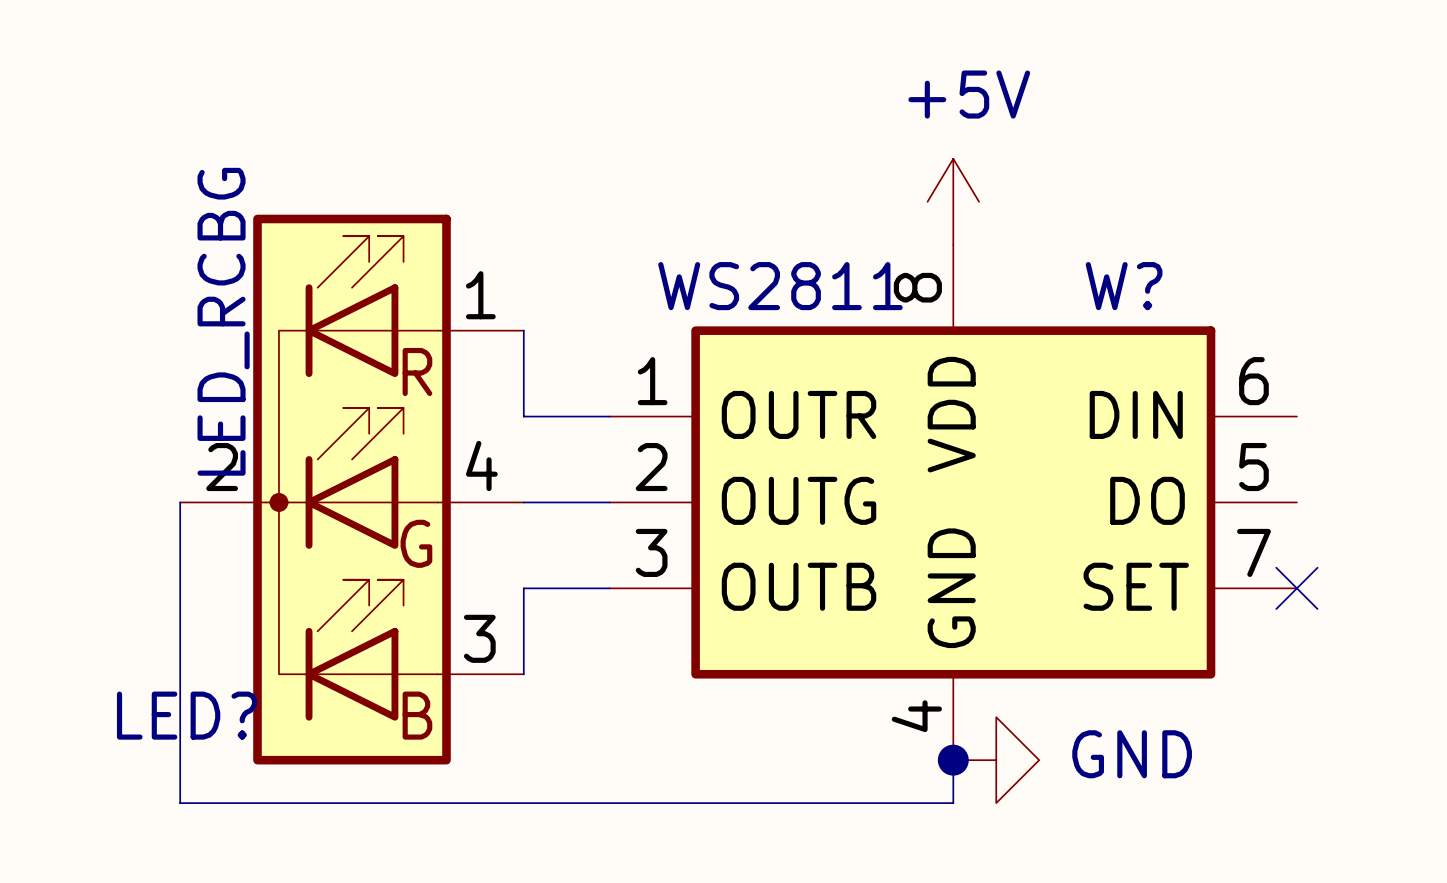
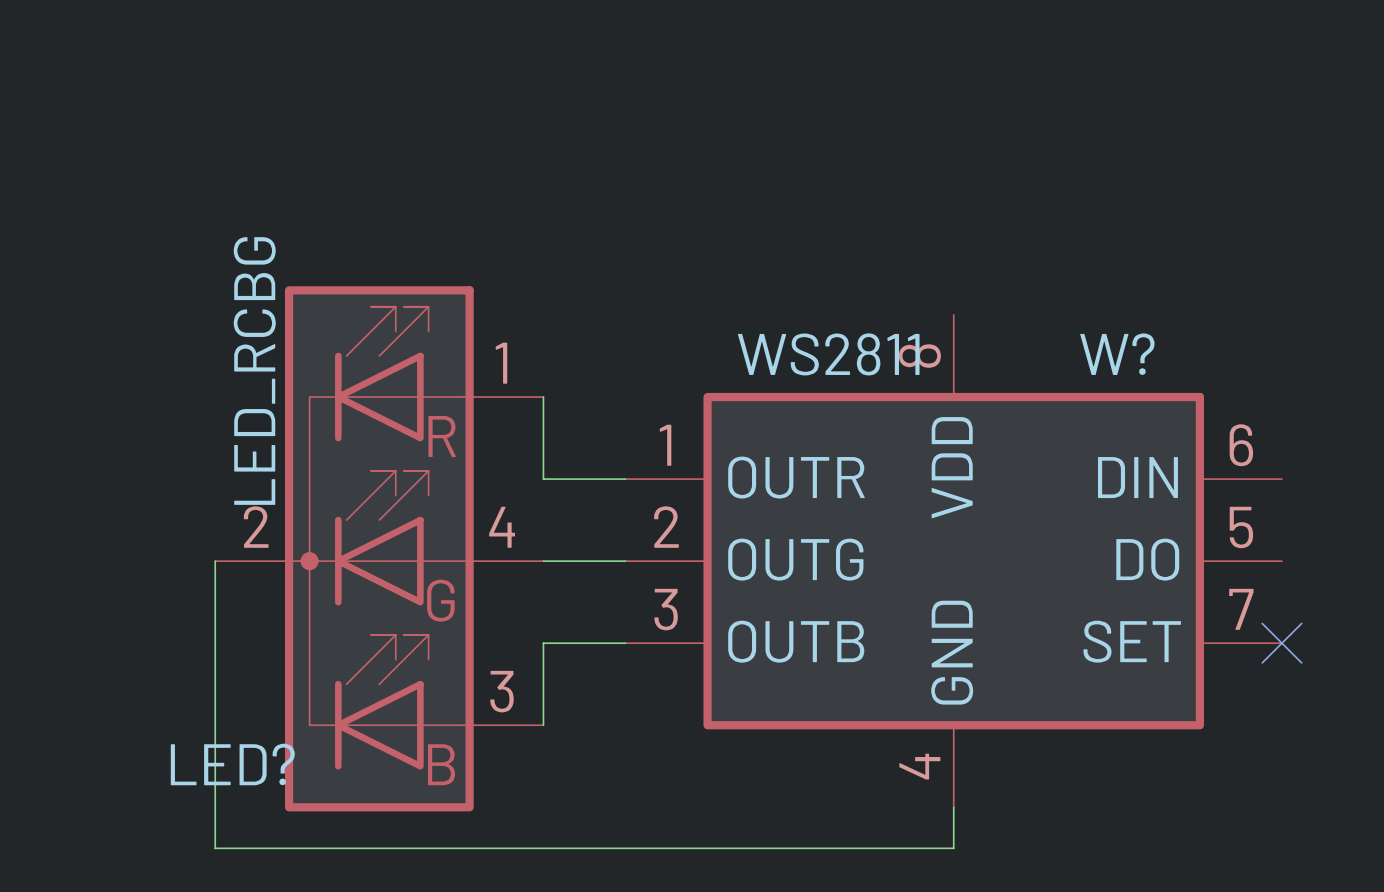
power symbol: +5V (953, 201) -> none
W? value position: WS2811 (780, 286) -> WS2811 (828, 354)
junction: (953, 760) -> none
power symbol: GND (996, 760) -> none

